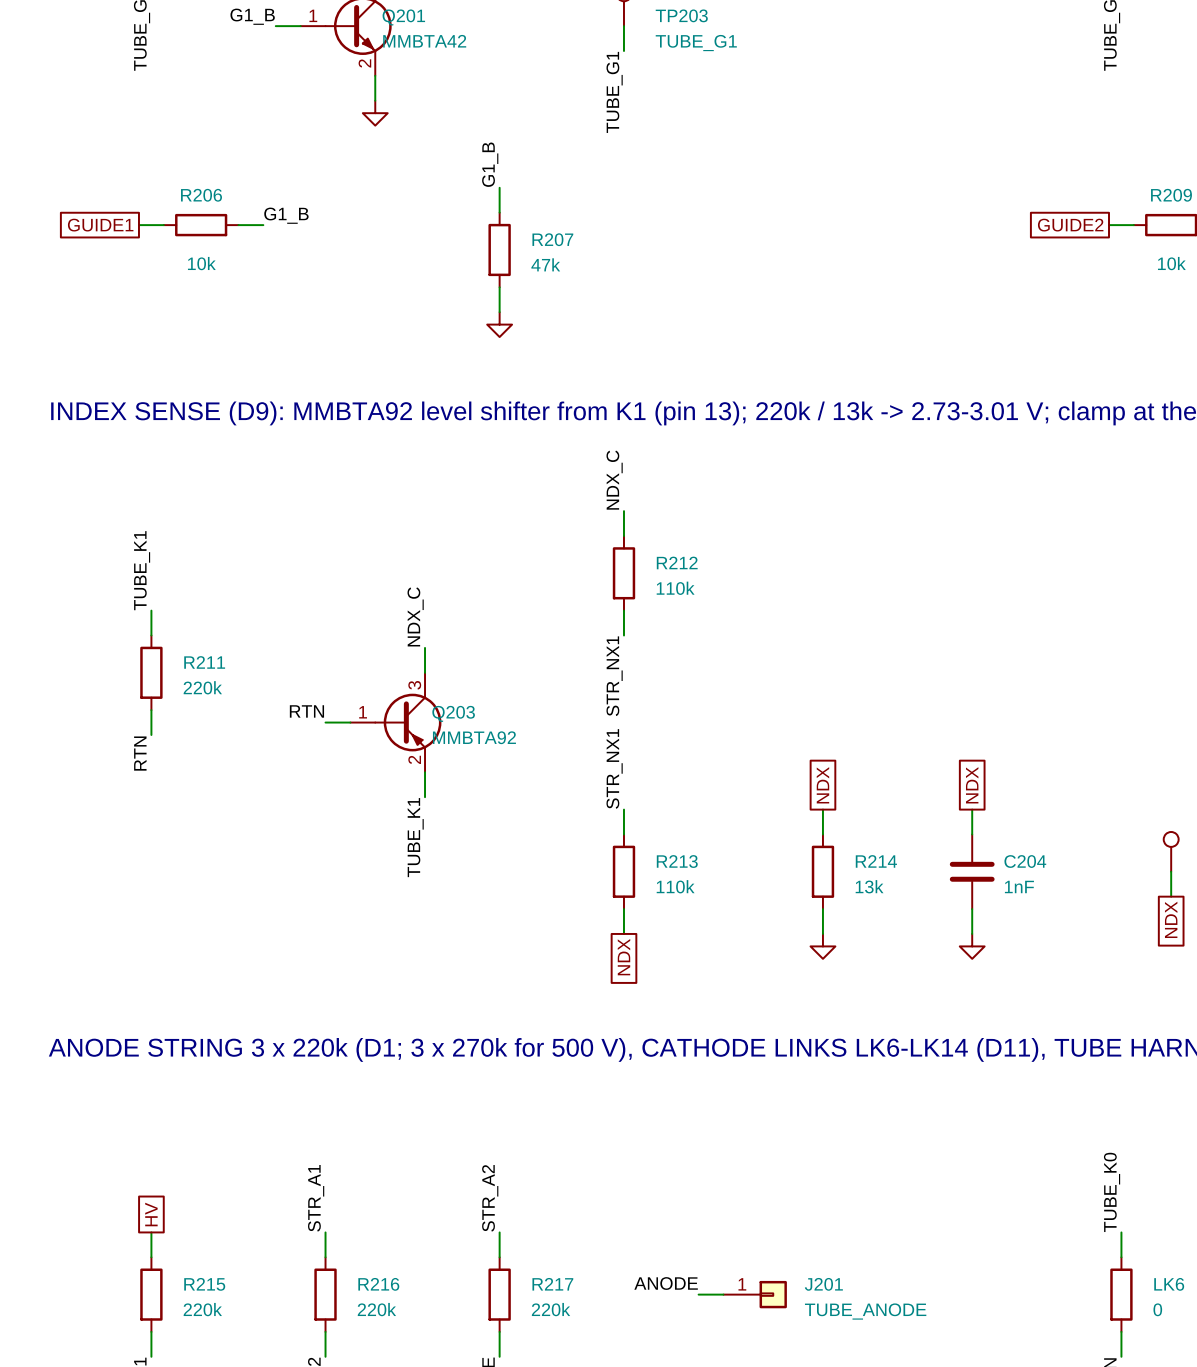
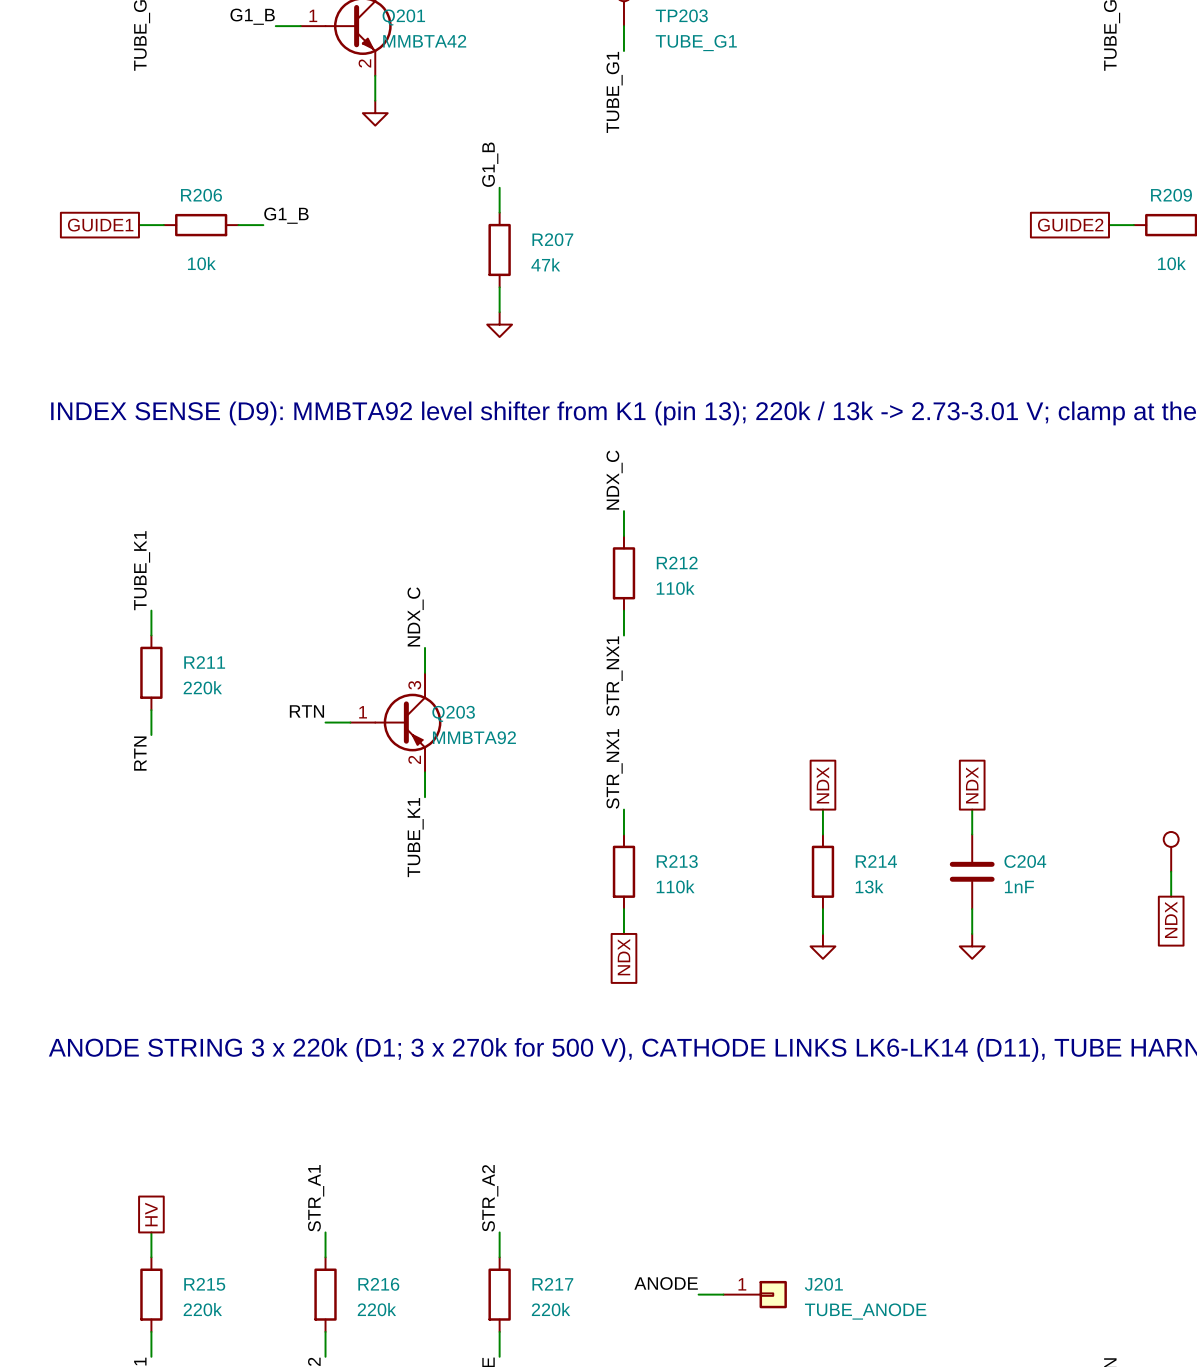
label: TUBE_K0 (1112, 1192) -> none
wire: (1121, 1232) (1121, 1257) -> none
LK6: 0 (1121, 1294) -> none
wire: (1121, 1331) (1121, 1356) -> none

